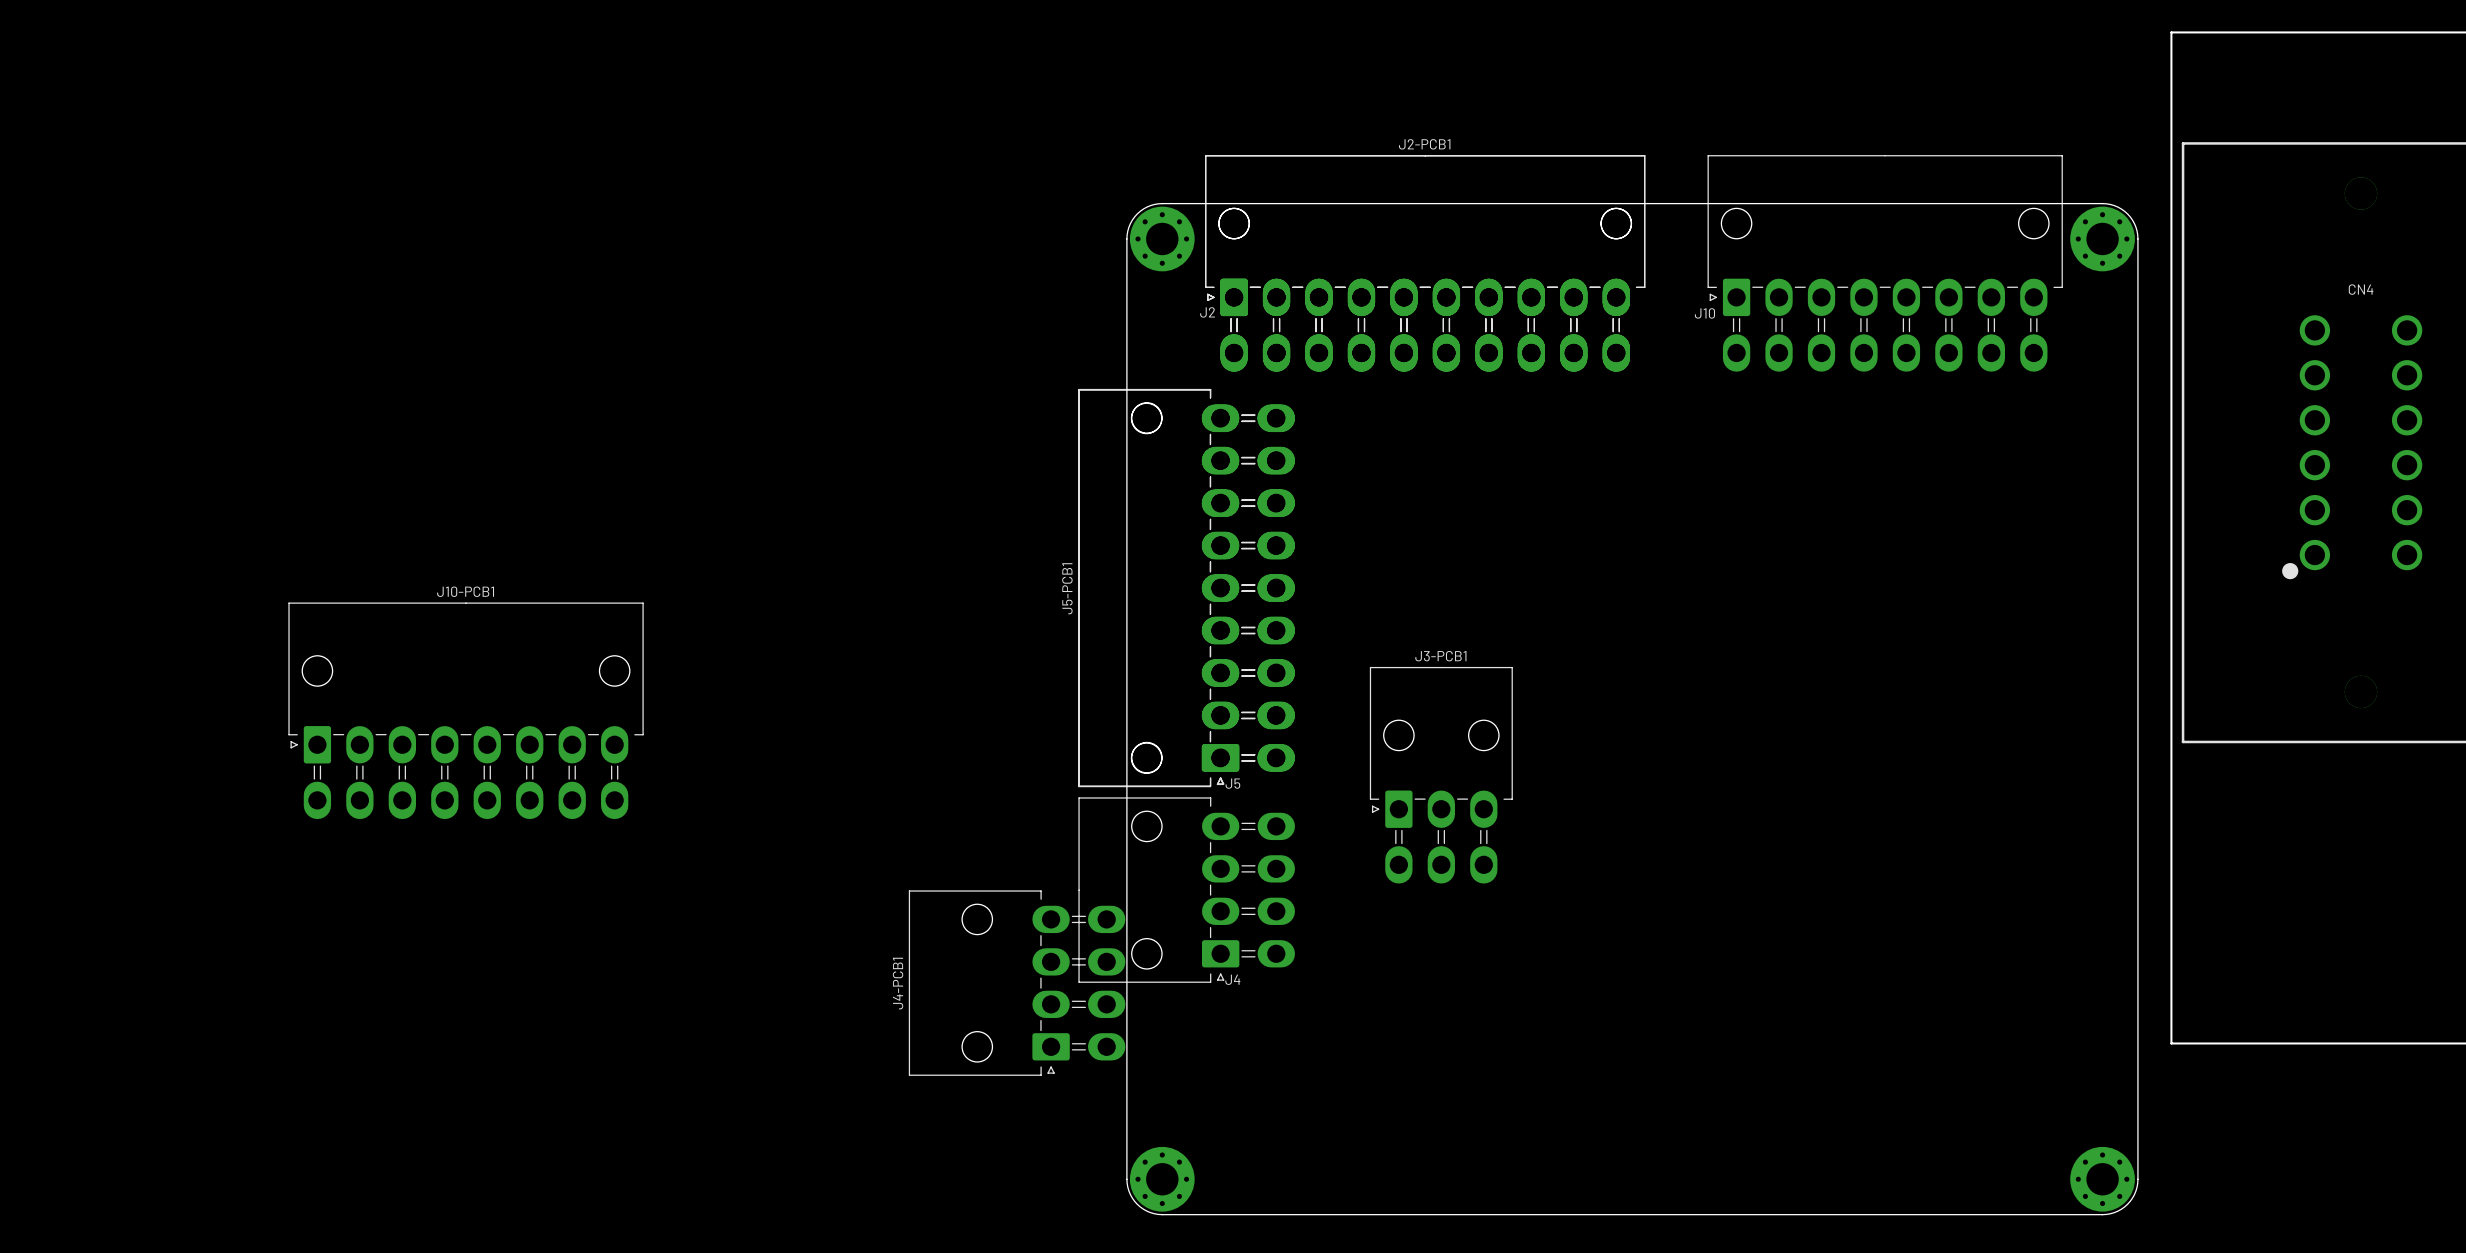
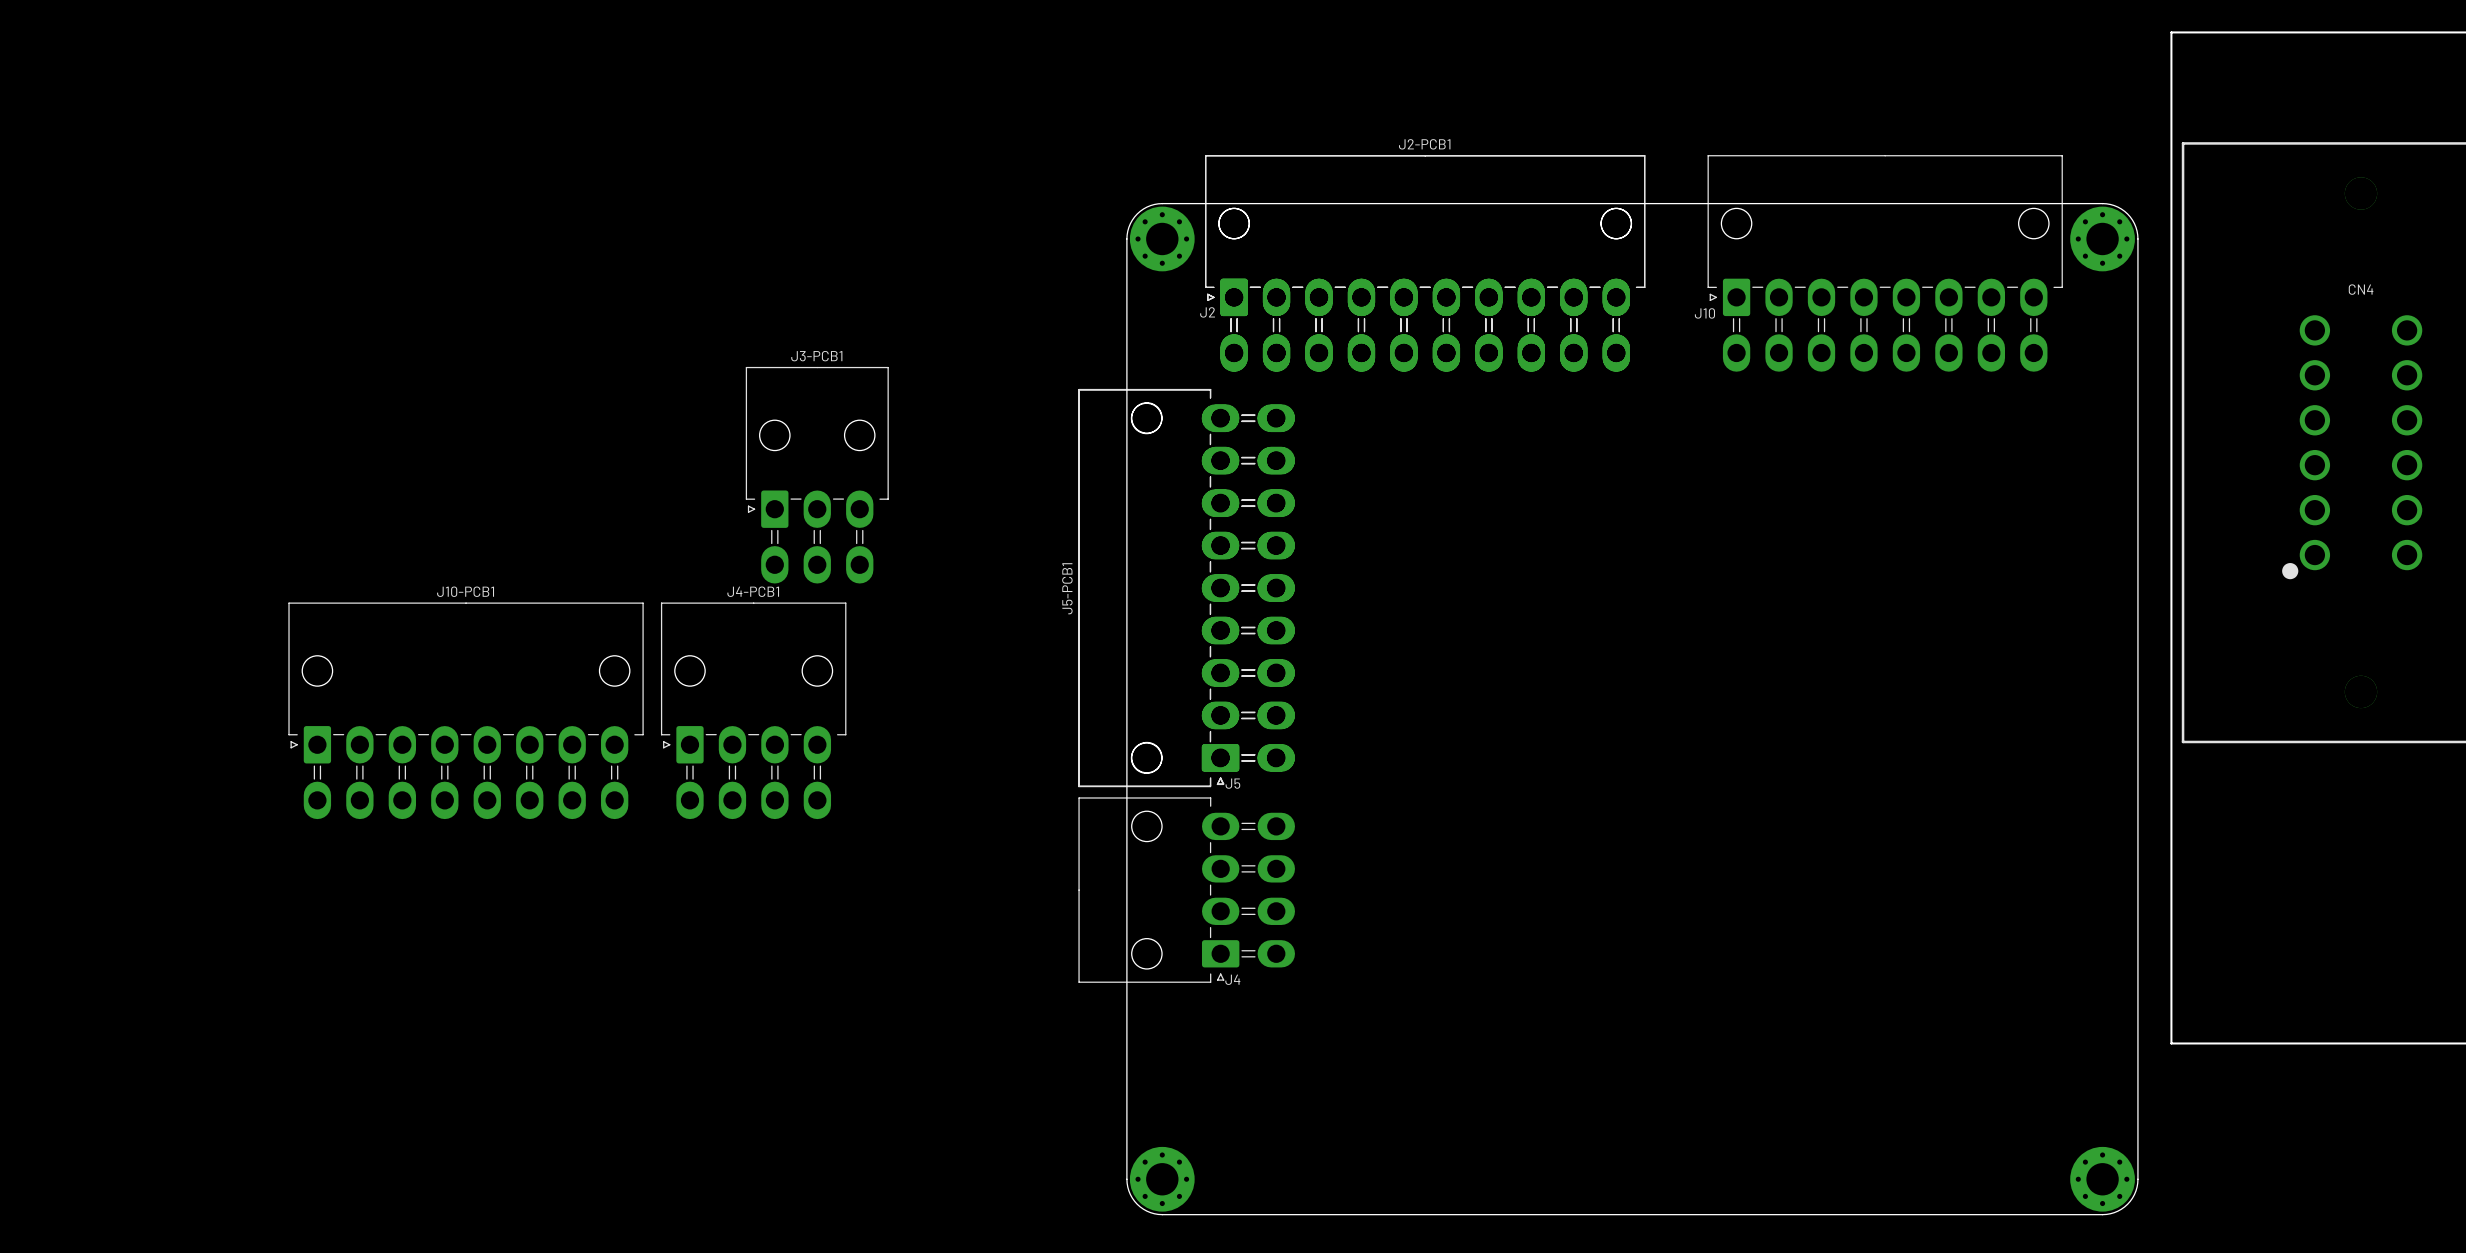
J3-PCB1 position: (1441, 775) -> (817, 475)
J4-PCB1 rotation: 0° (1017, 983) -> 90° clockwise (753, 710)
J4-PCB1 position: (1017, 983) -> (753, 710)

